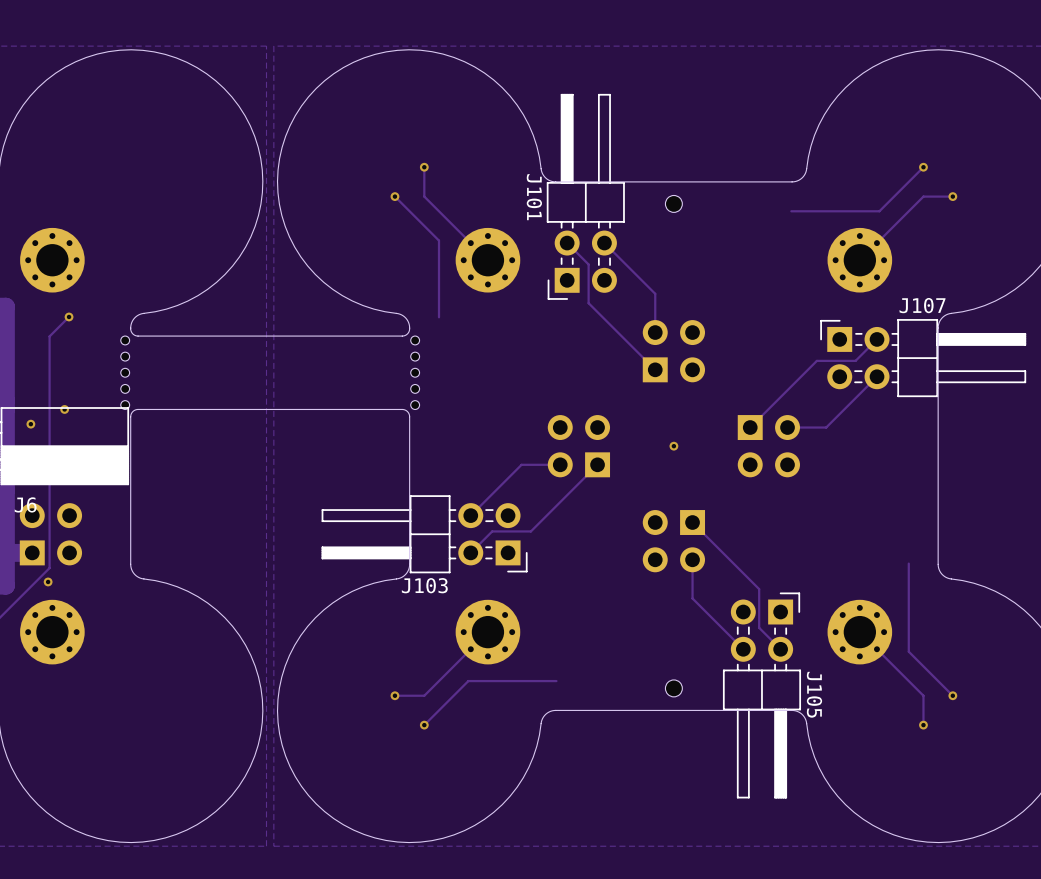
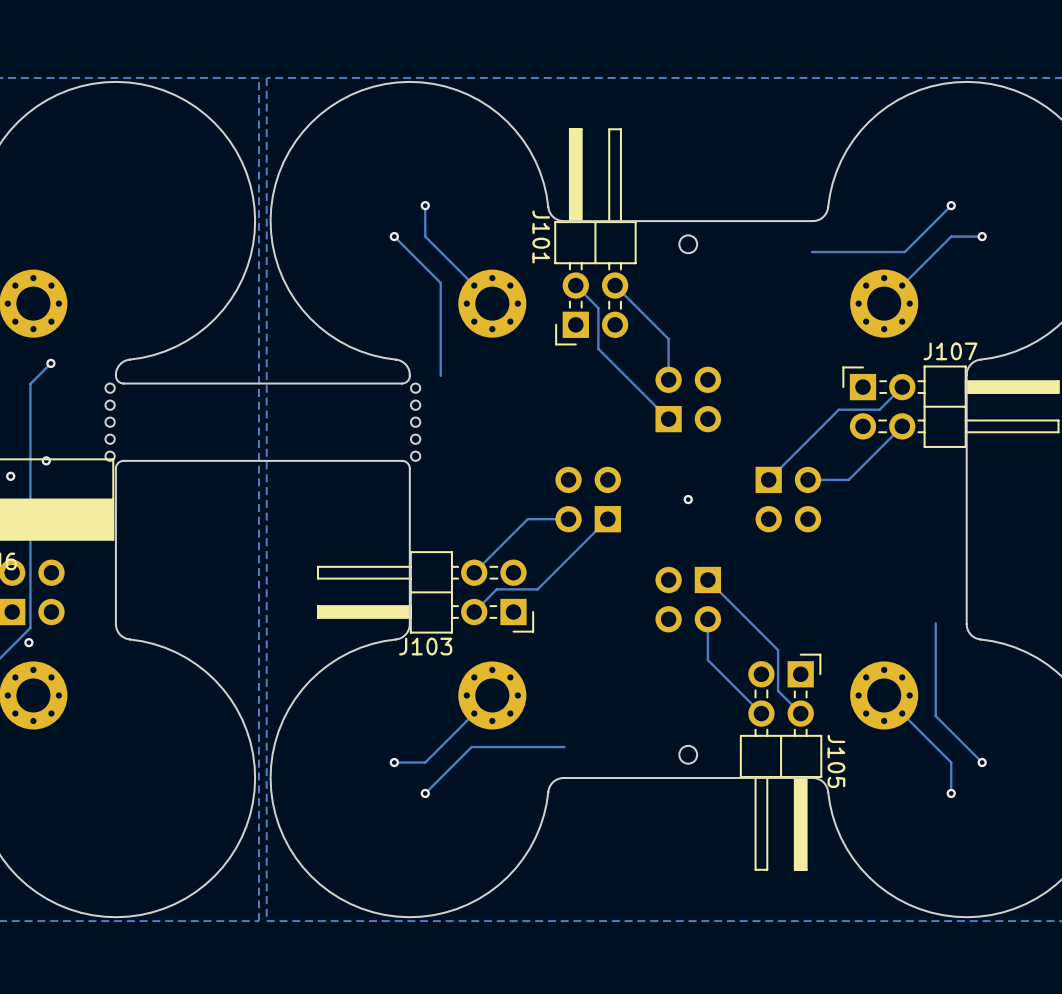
track: none -> (440, 363) (440, 375)

